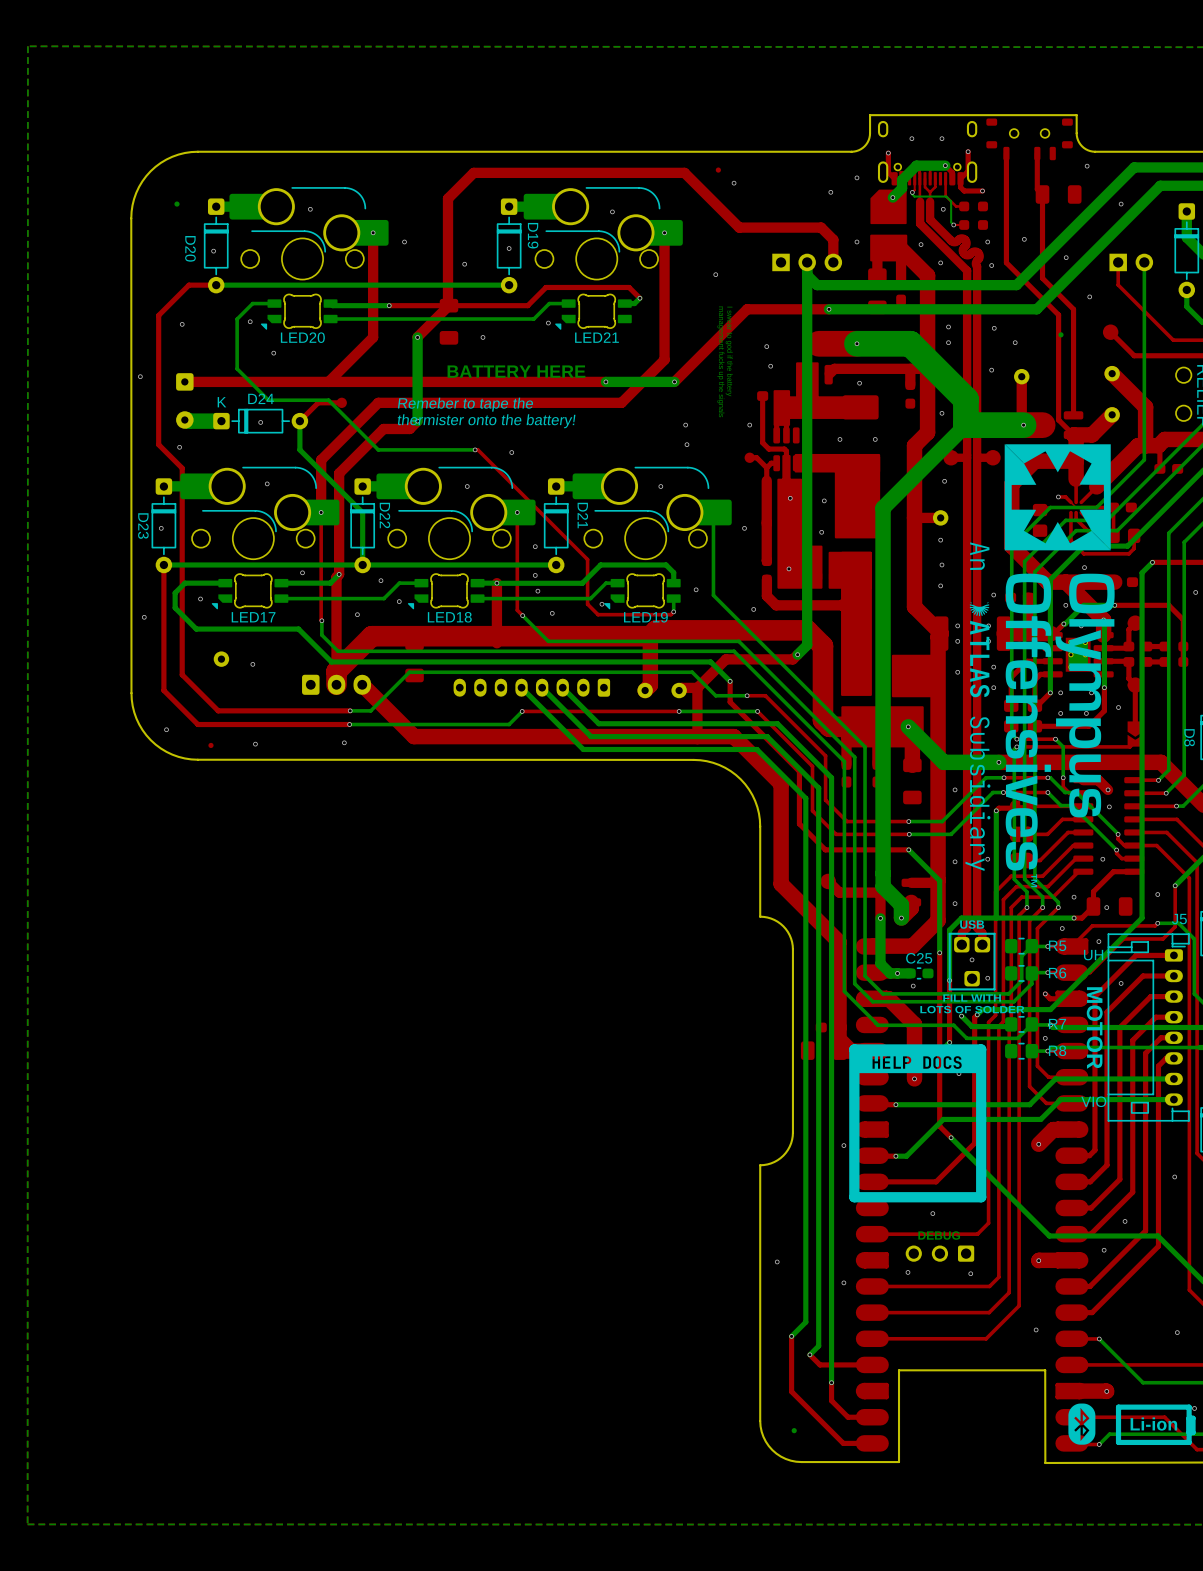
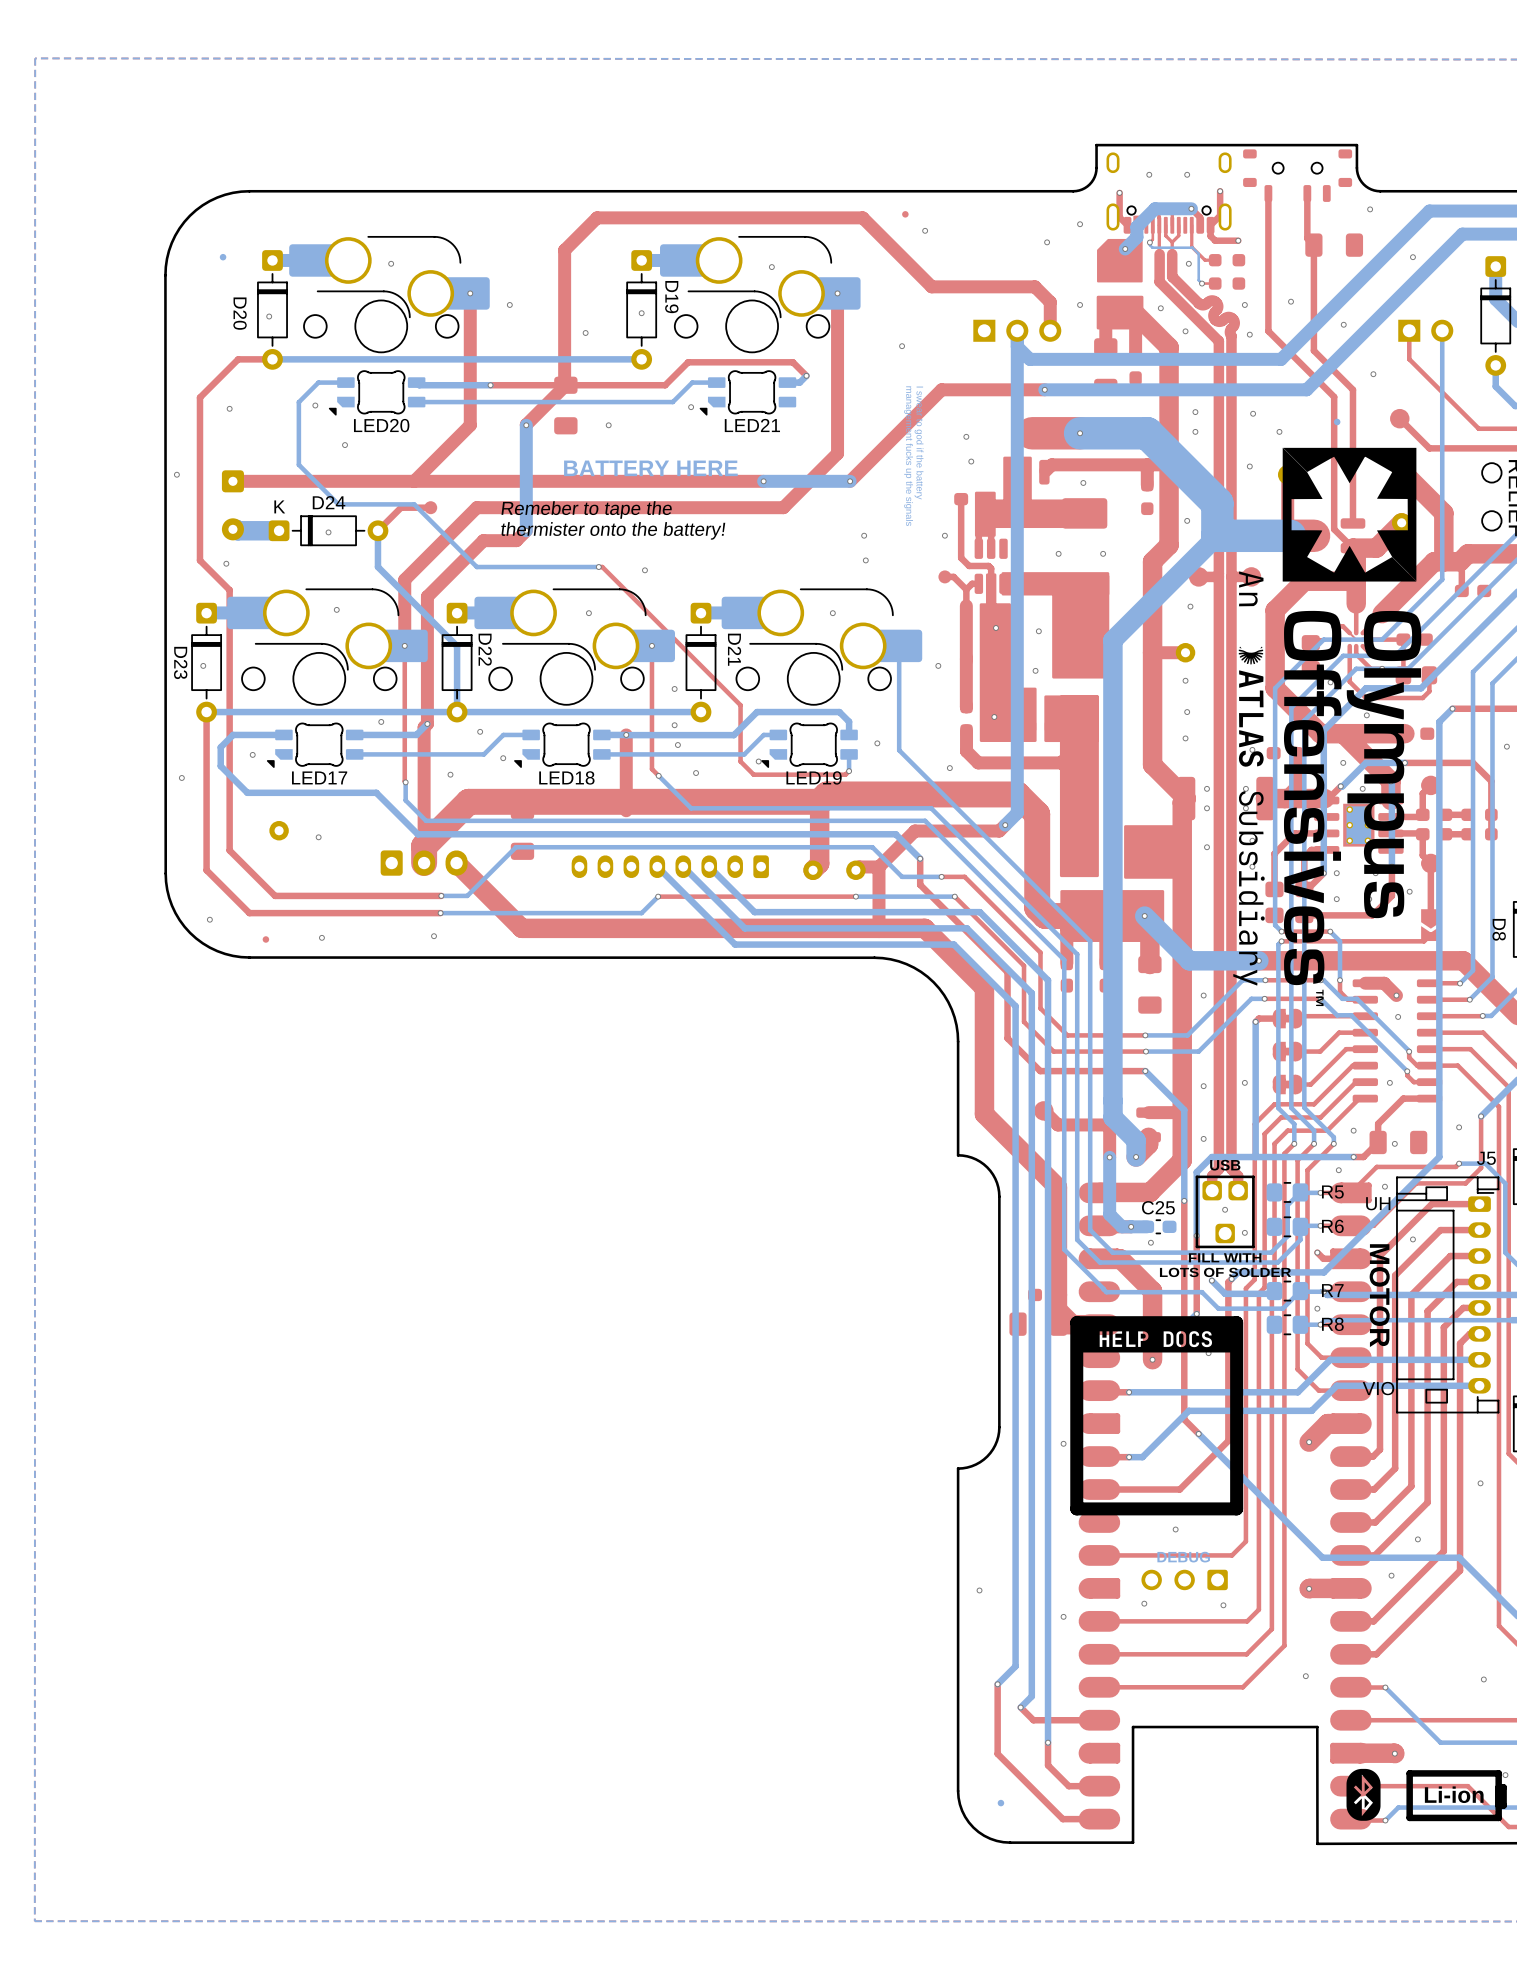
drawing position: (1040, 665) -> (1327, 726)

